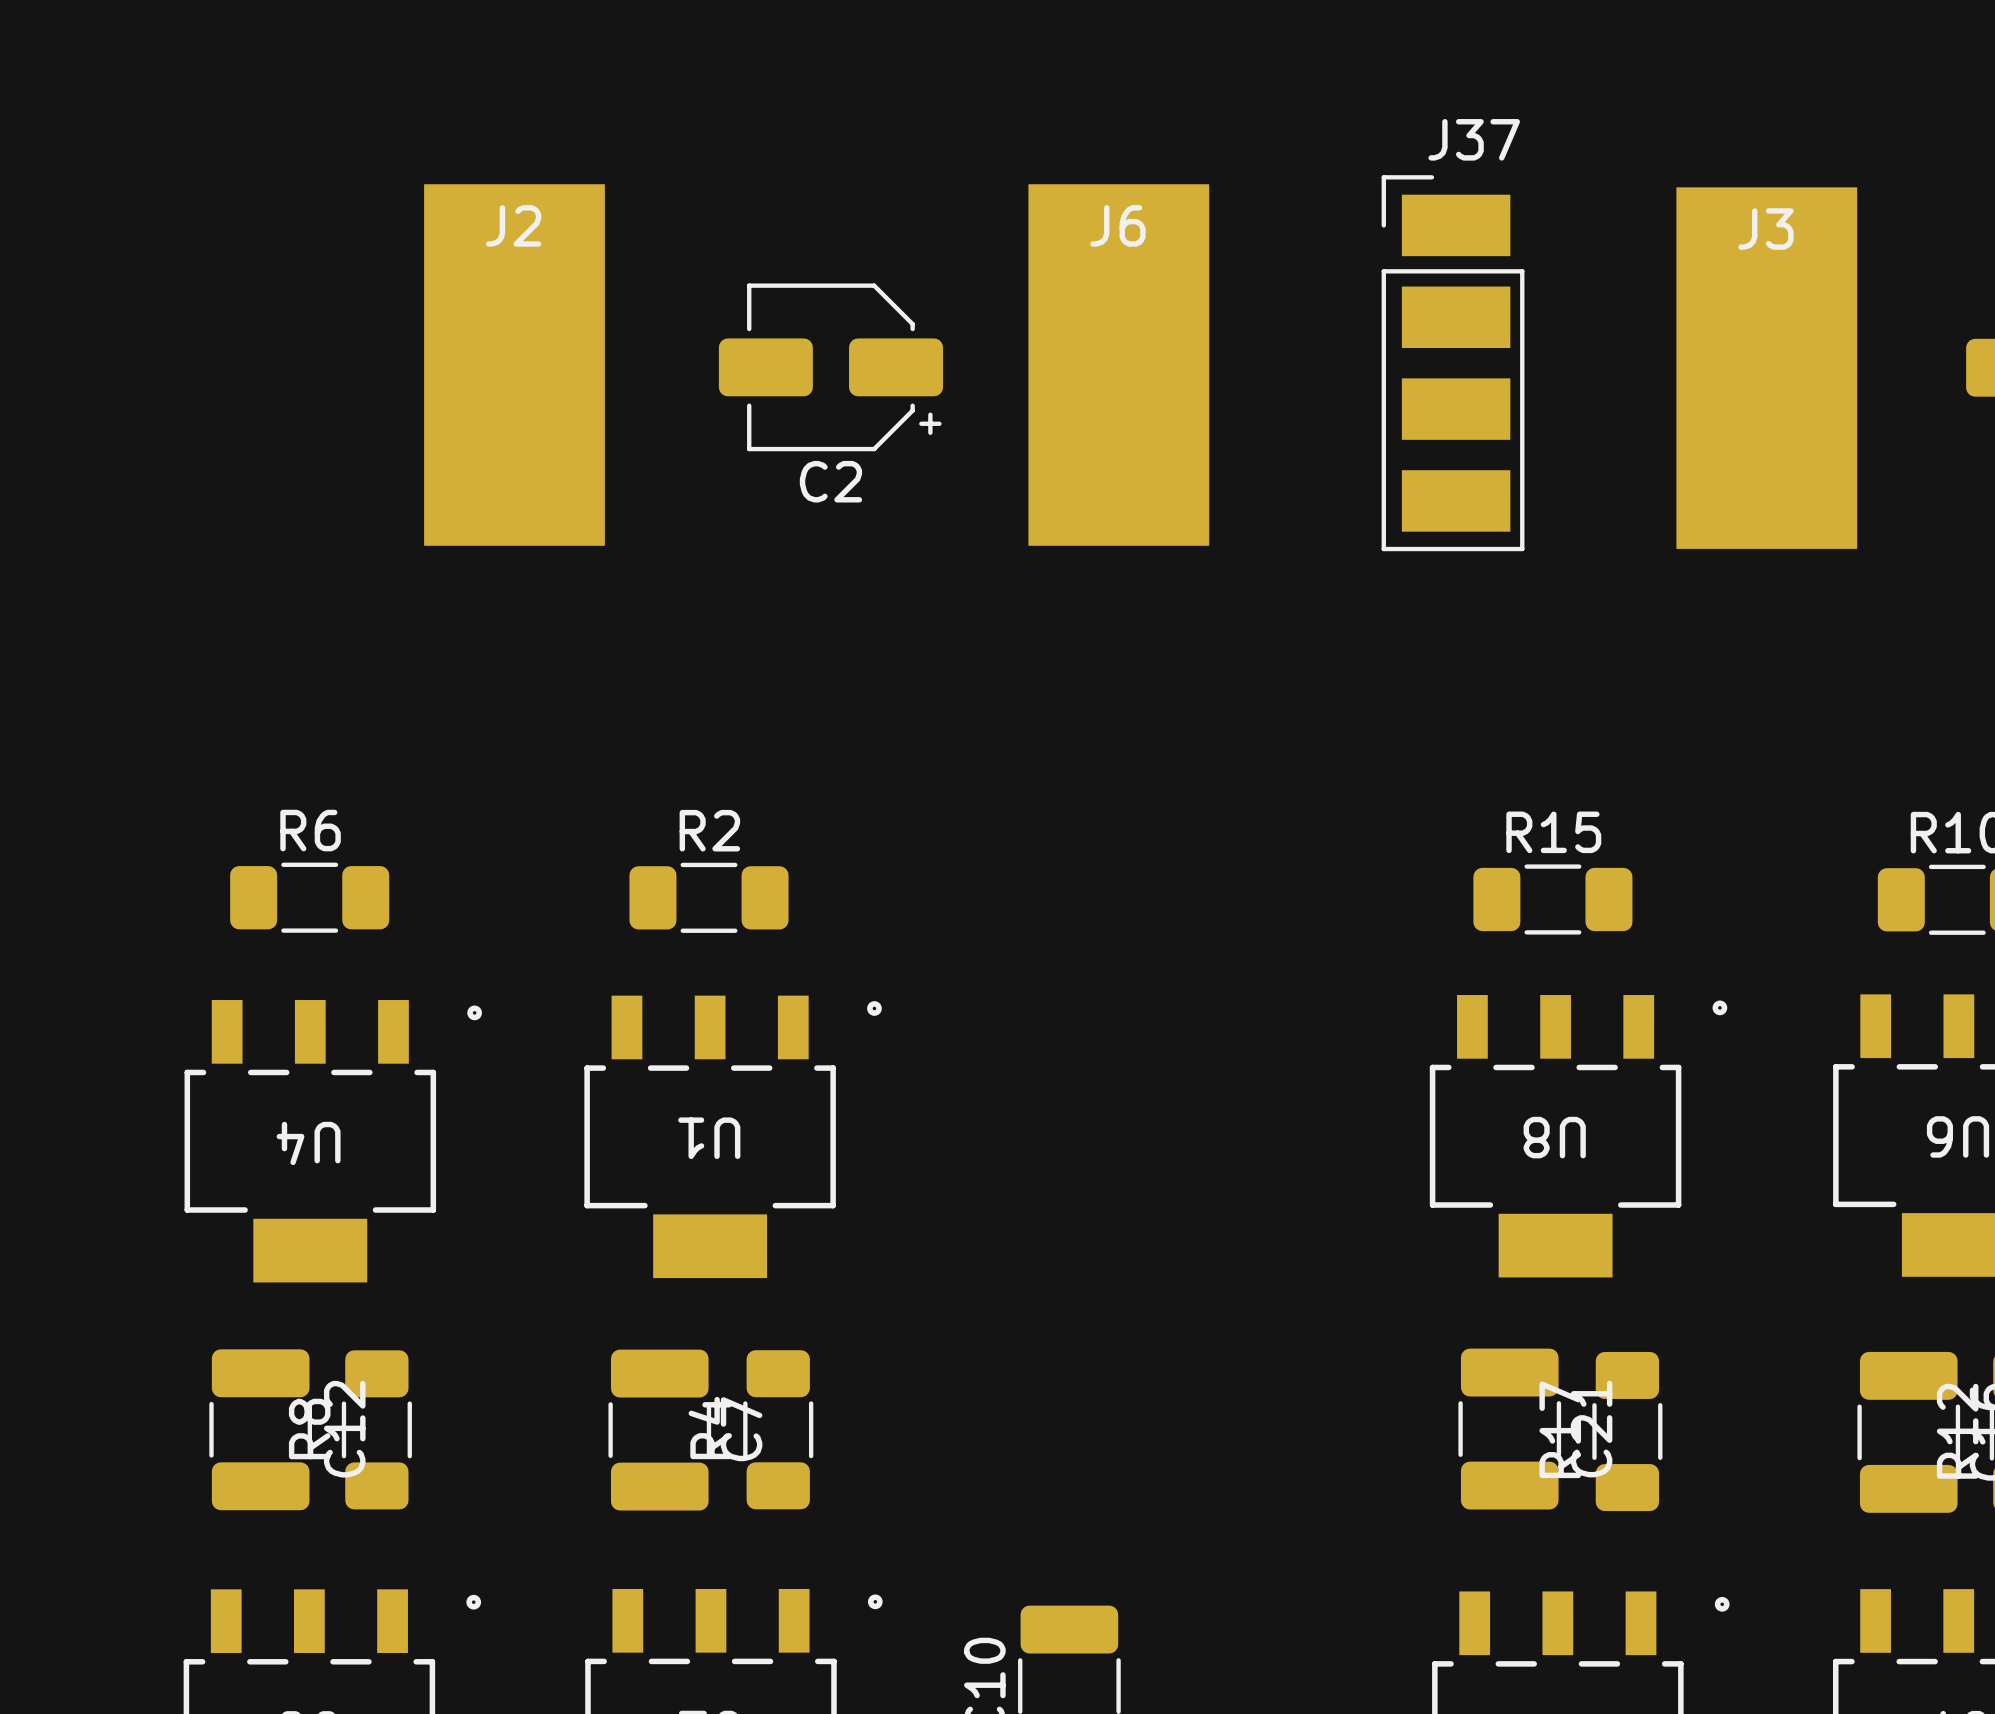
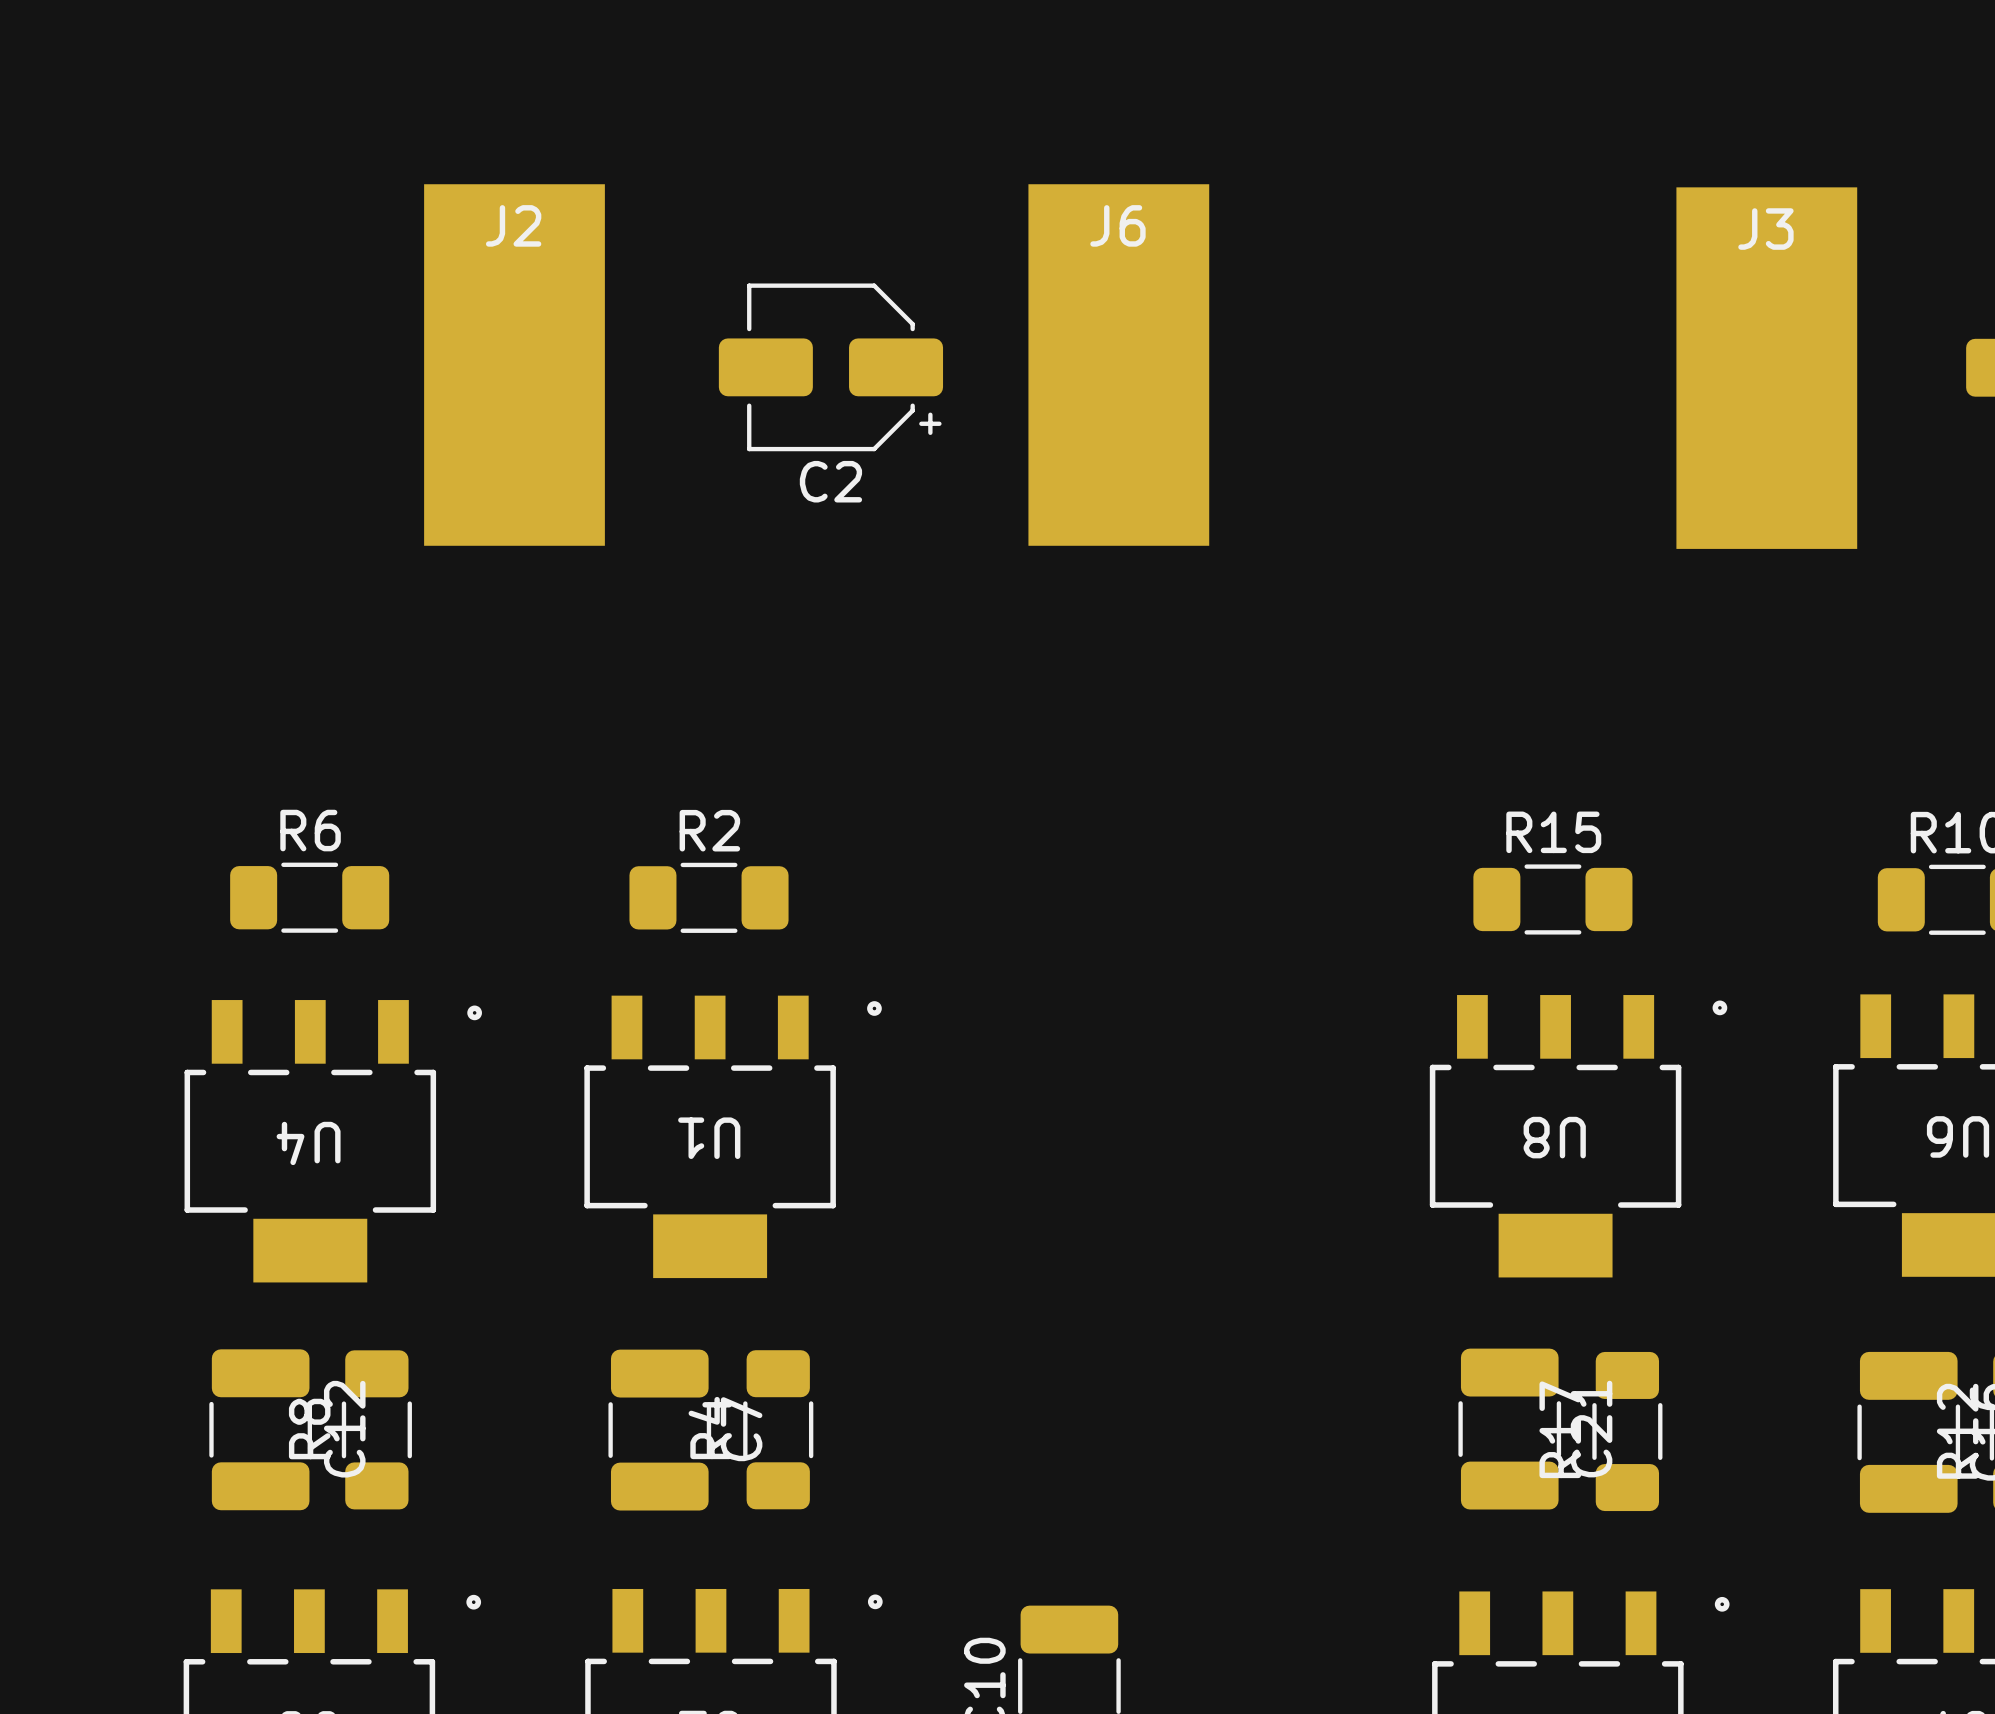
J37: (1453, 363) -> none

